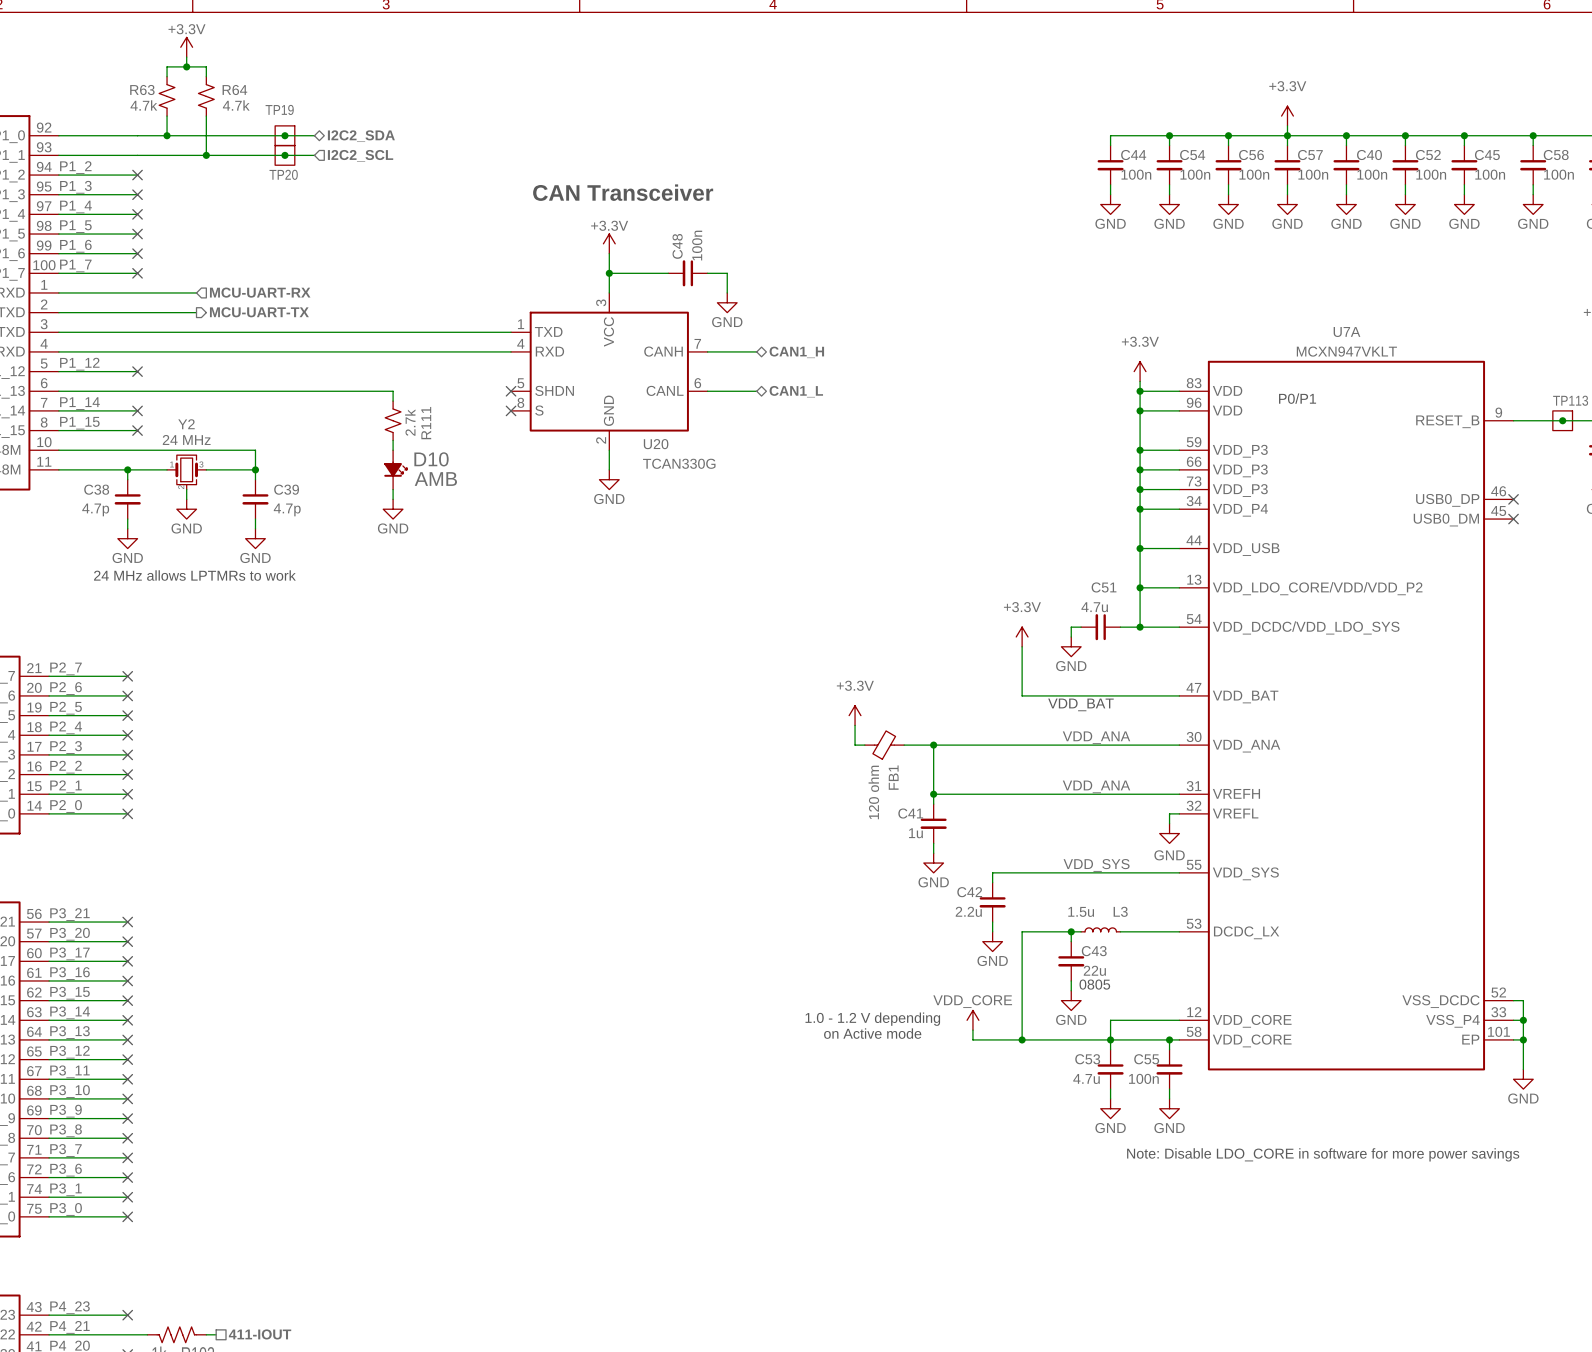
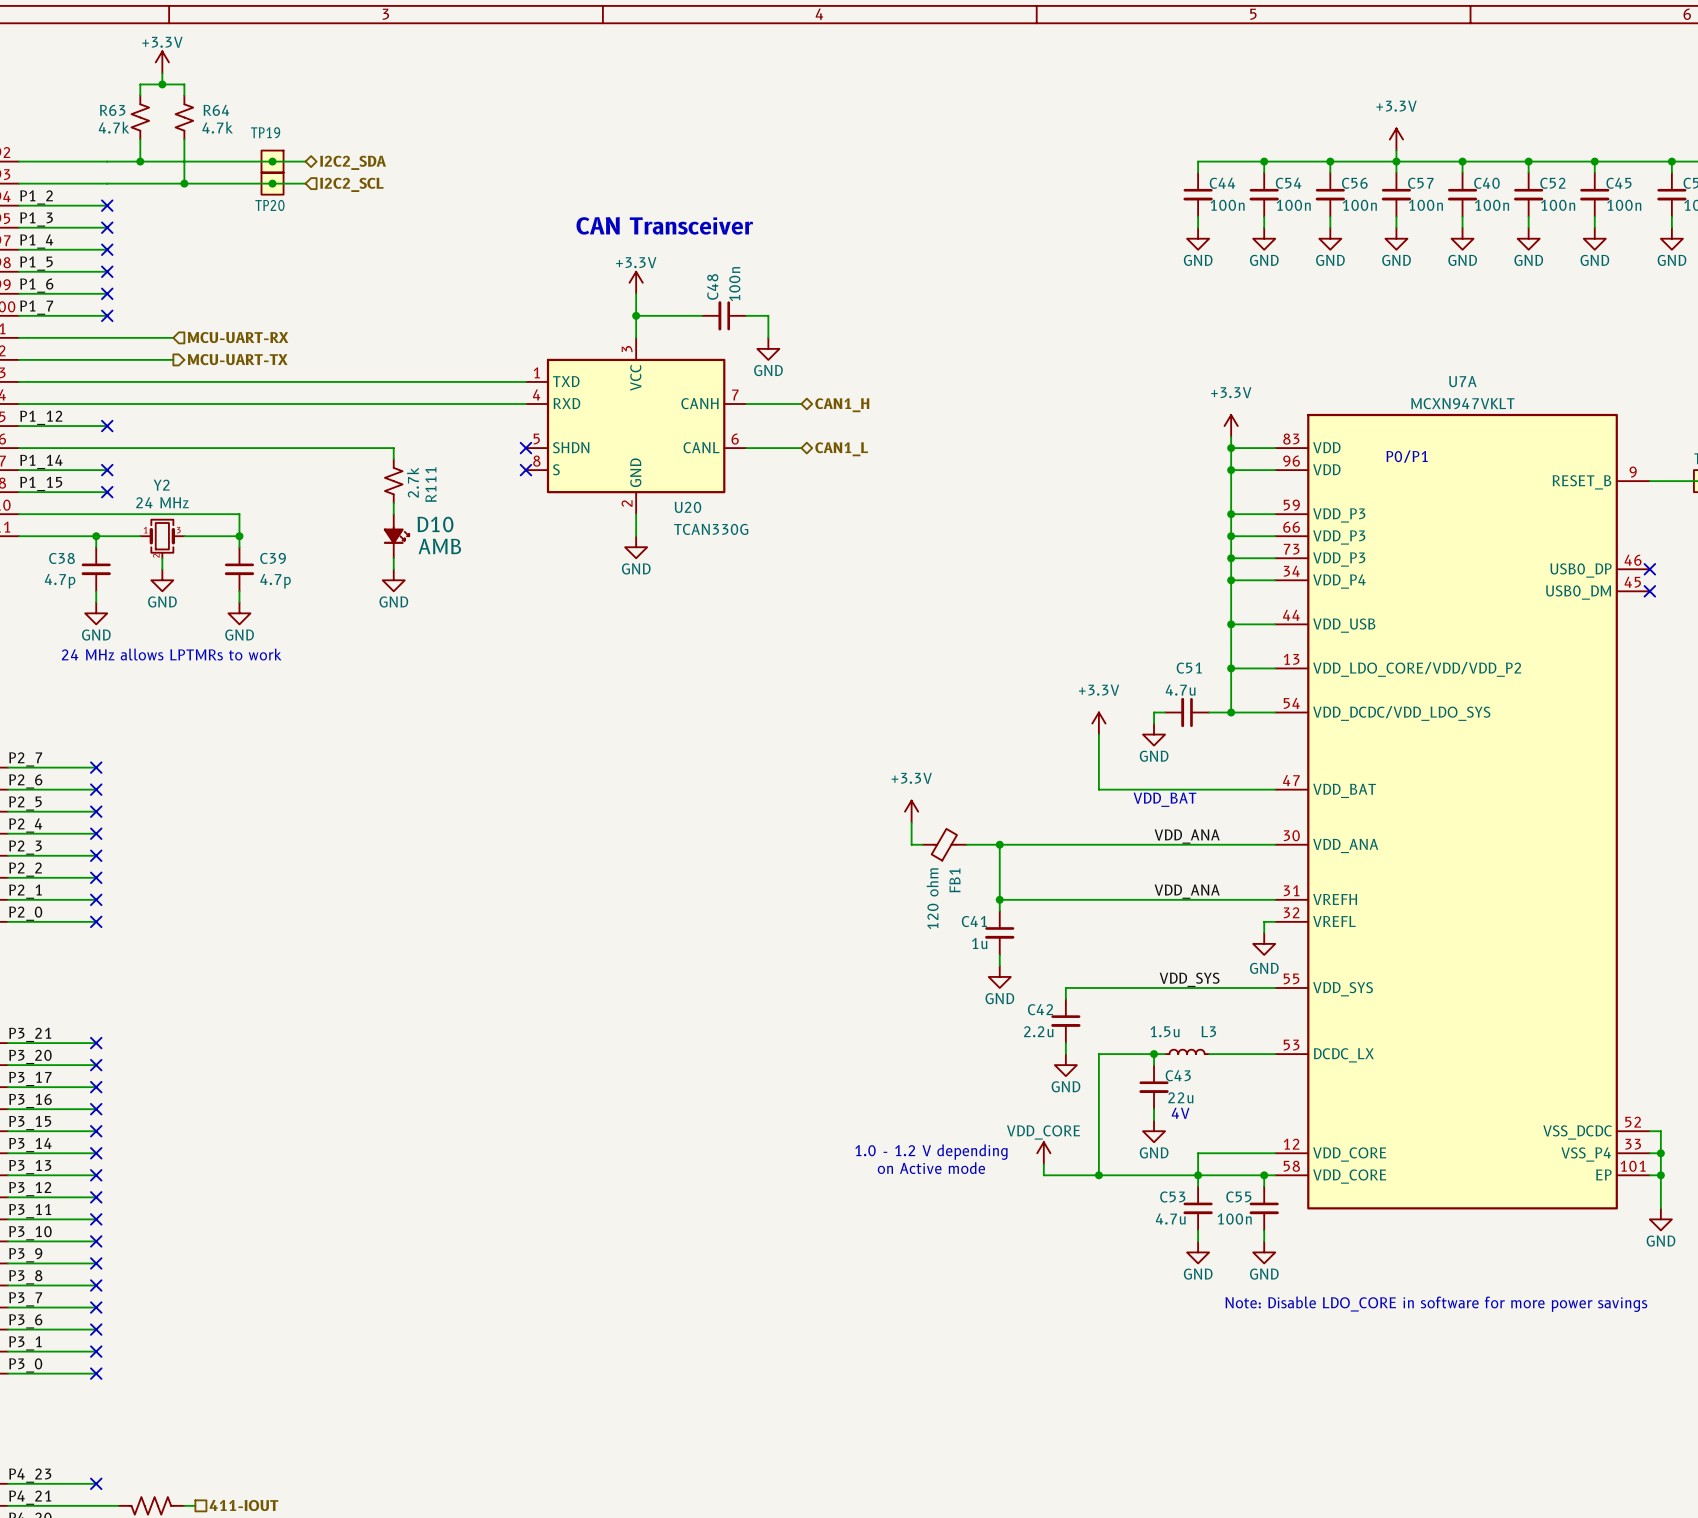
text: 0805 (1094, 984) -> 4V (1180, 1113)

